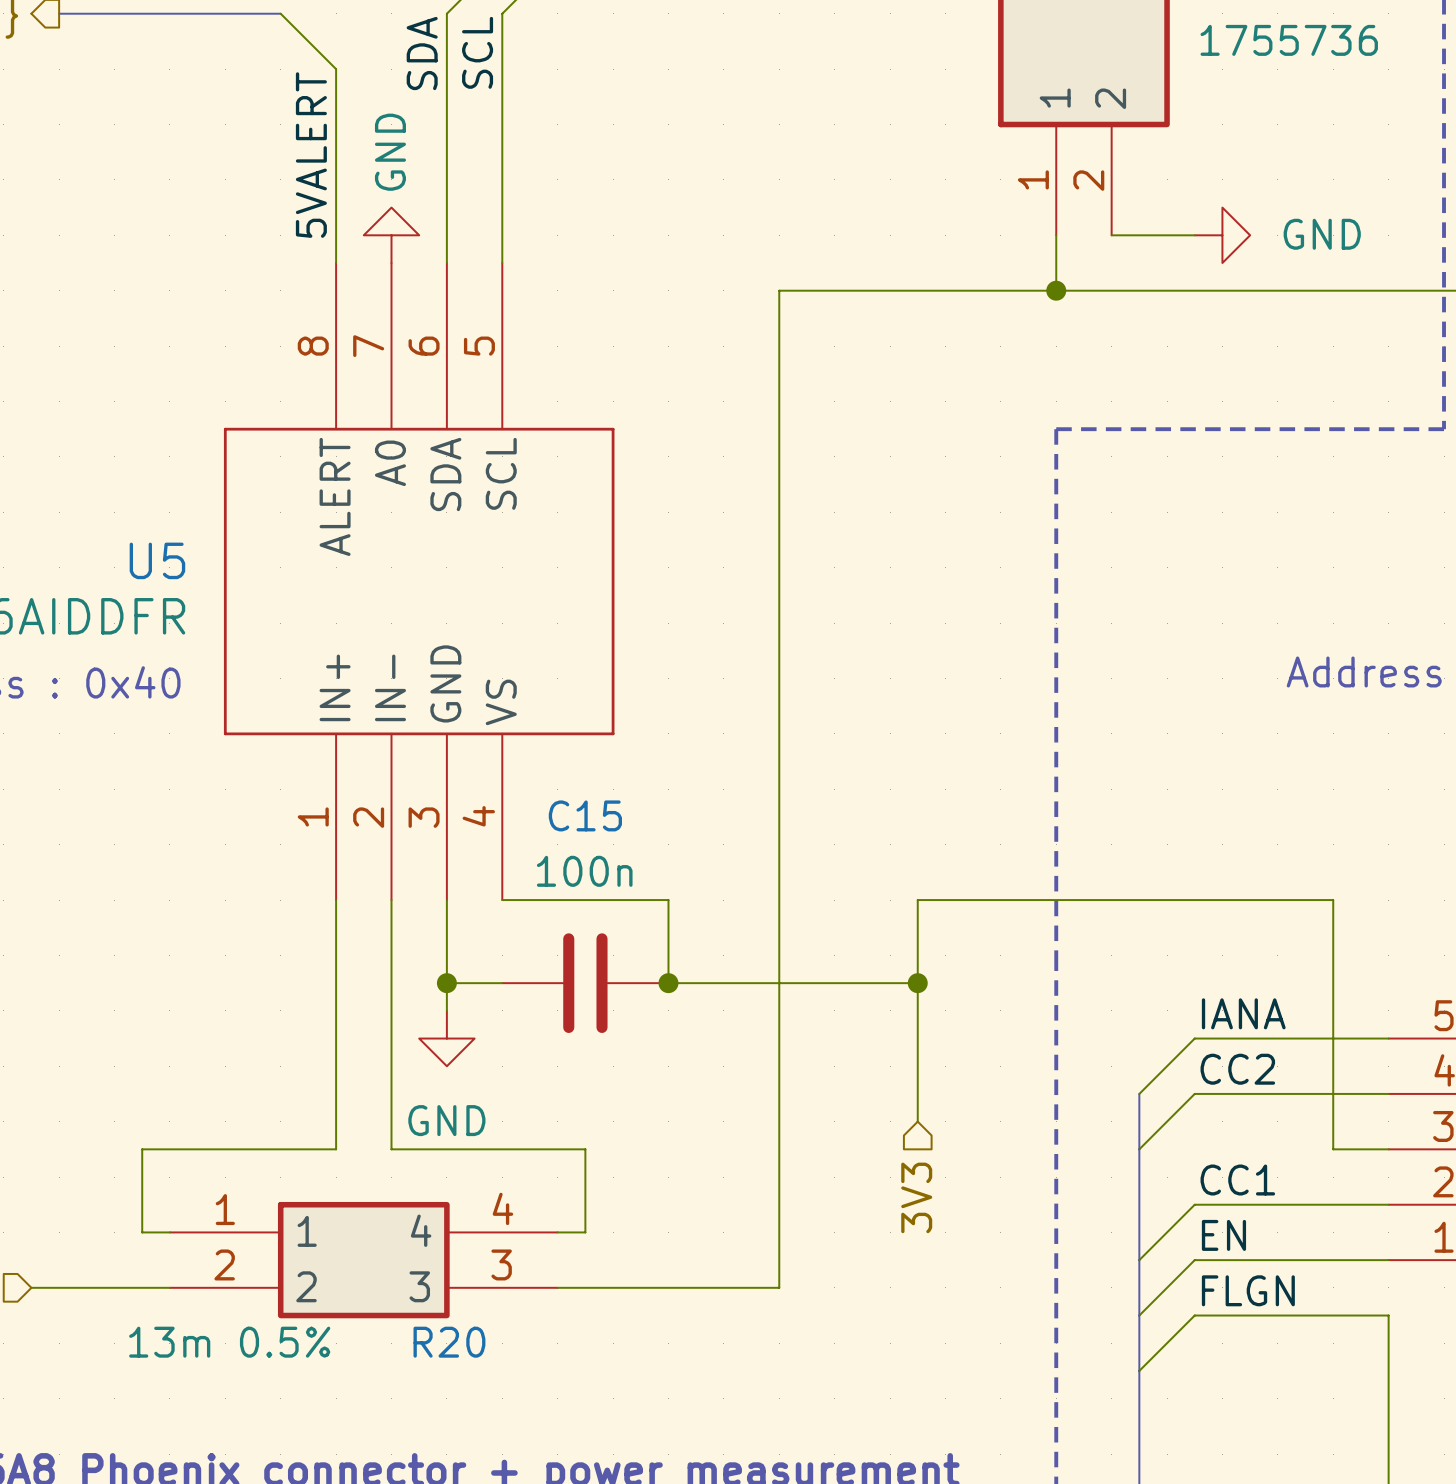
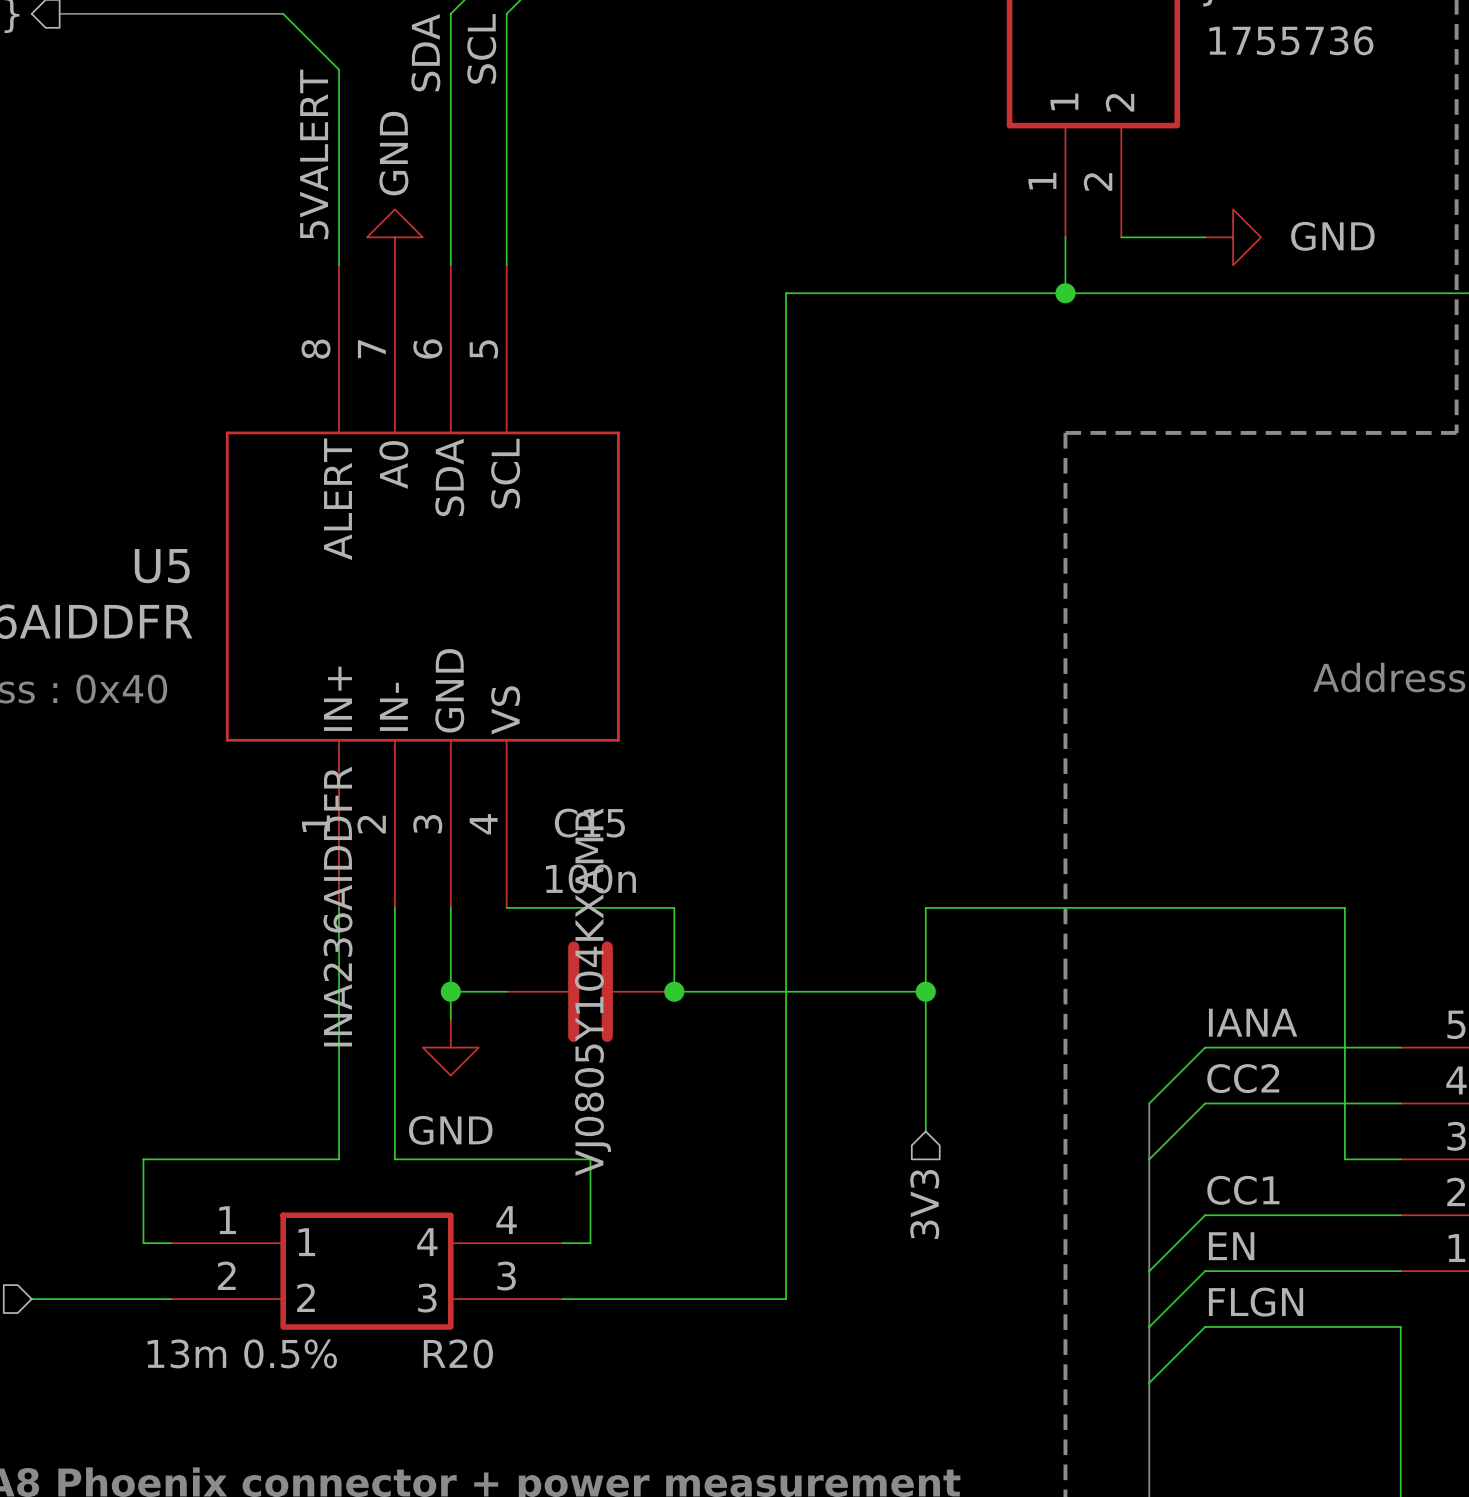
U5 text: none -> INA236AIDDFR (338, 906)
C15 text: none -> VJ0805Y104KXAMR (593, 992)

